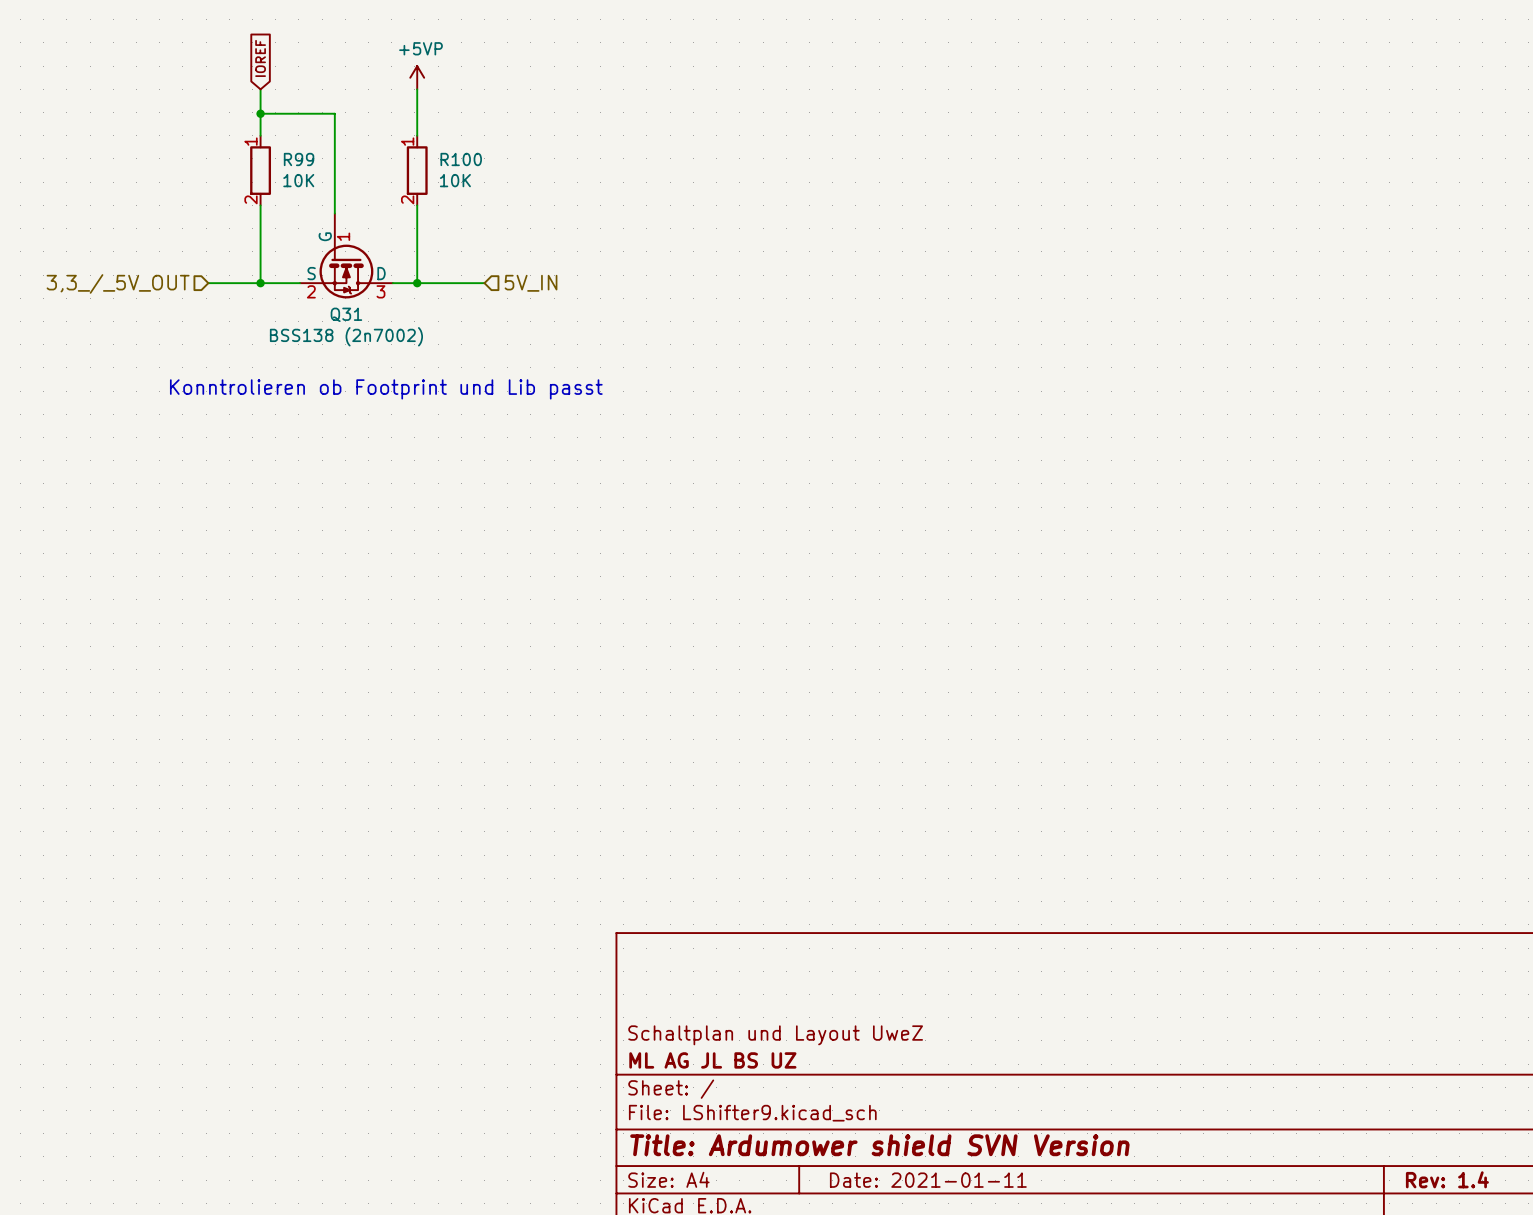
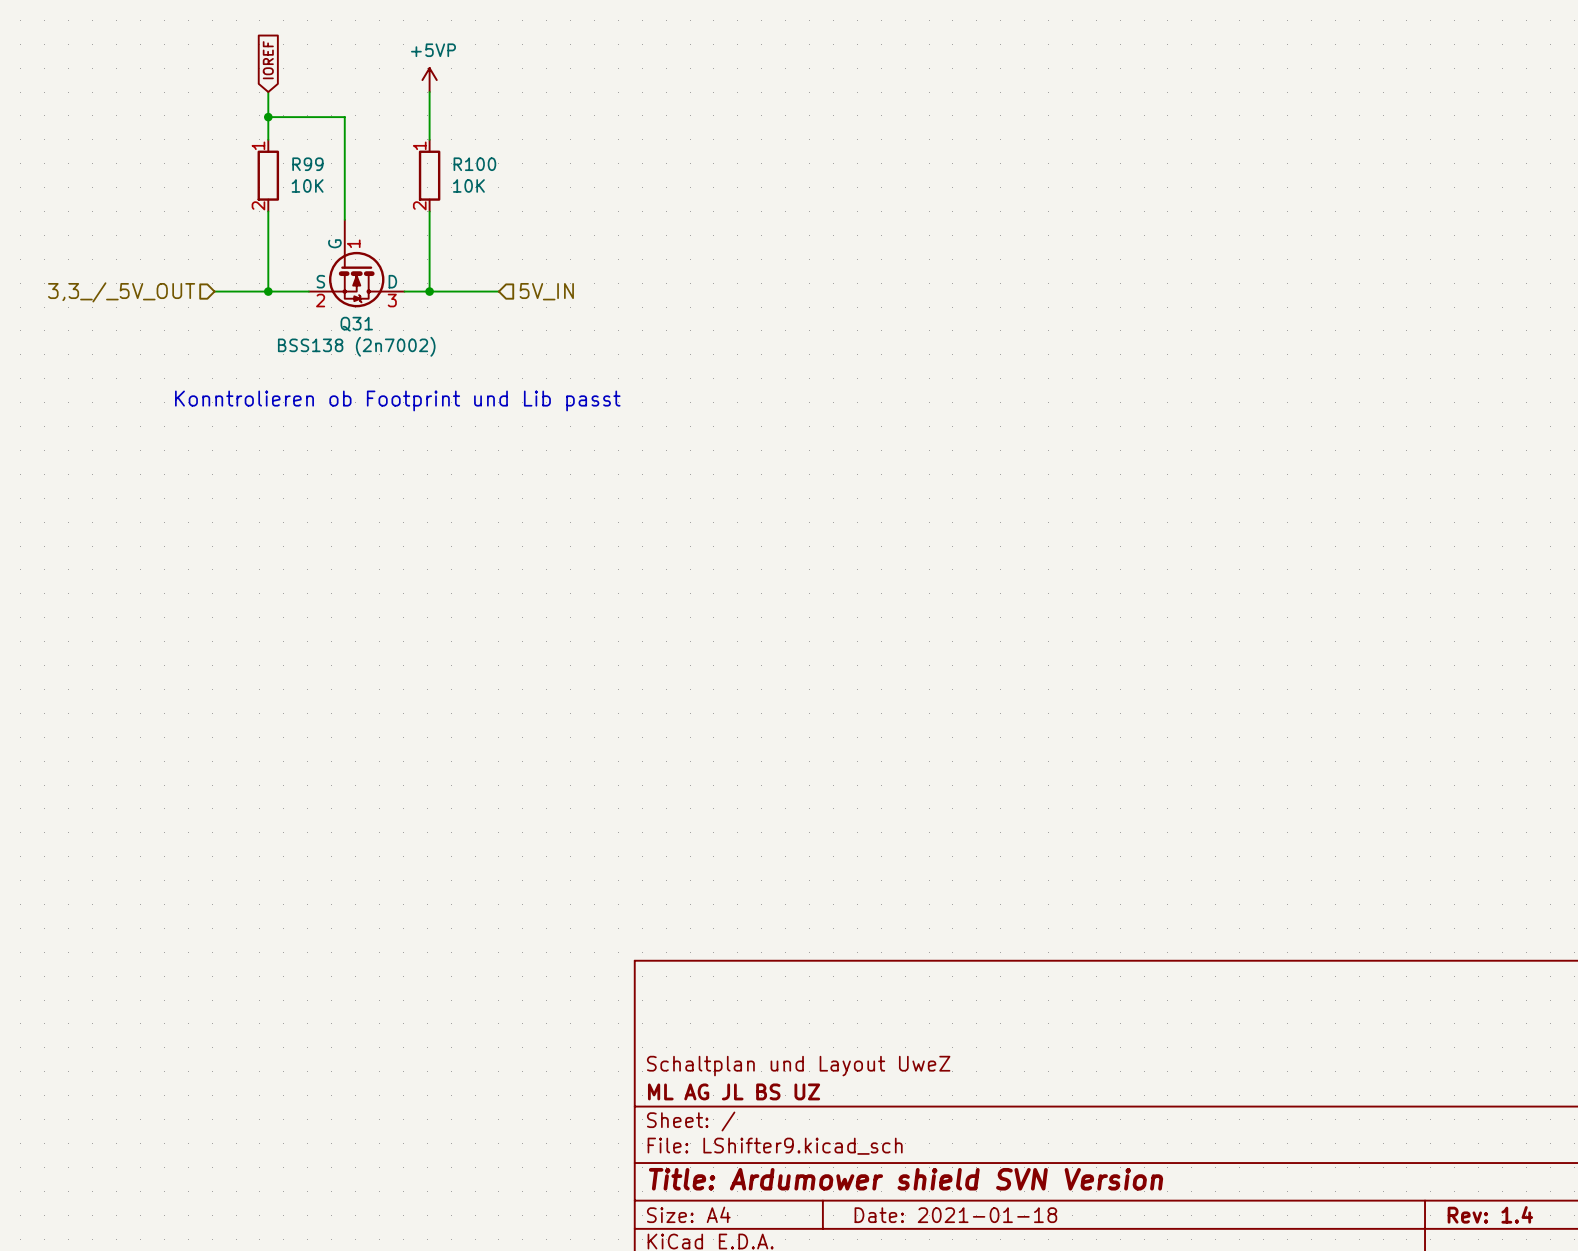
title block: Date: 2021-01-11 (928, 1180) -> Date: 2021-01-18 (955, 1215)

